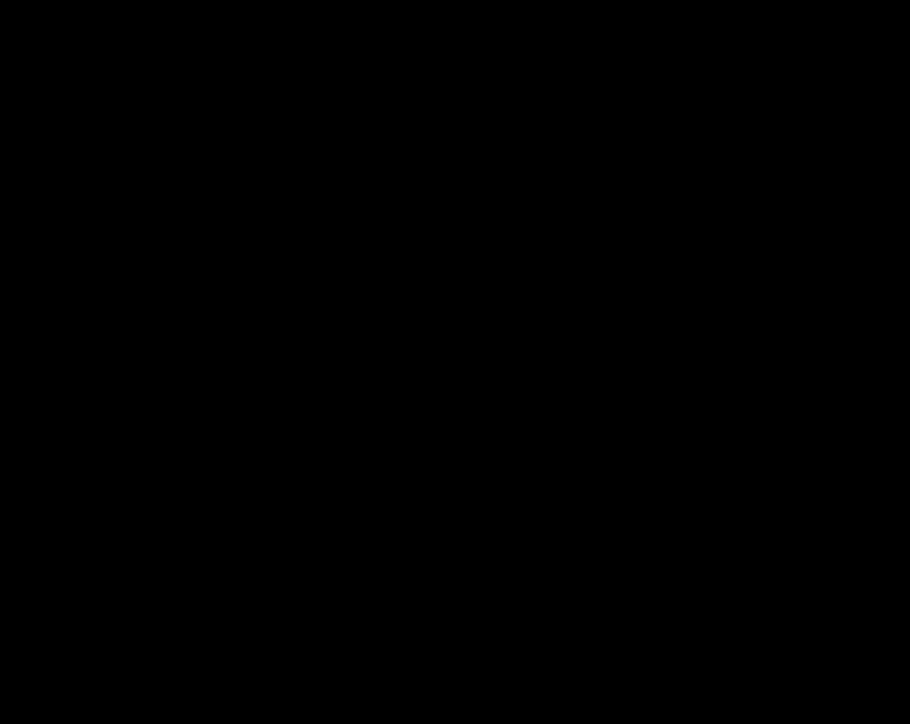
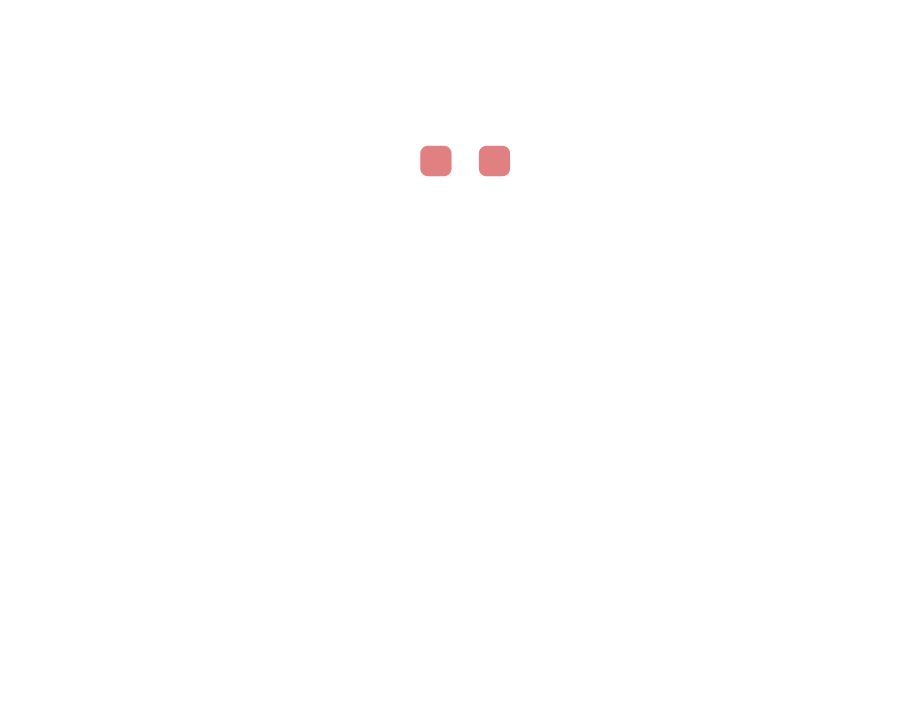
part: none -> (465, 161)

